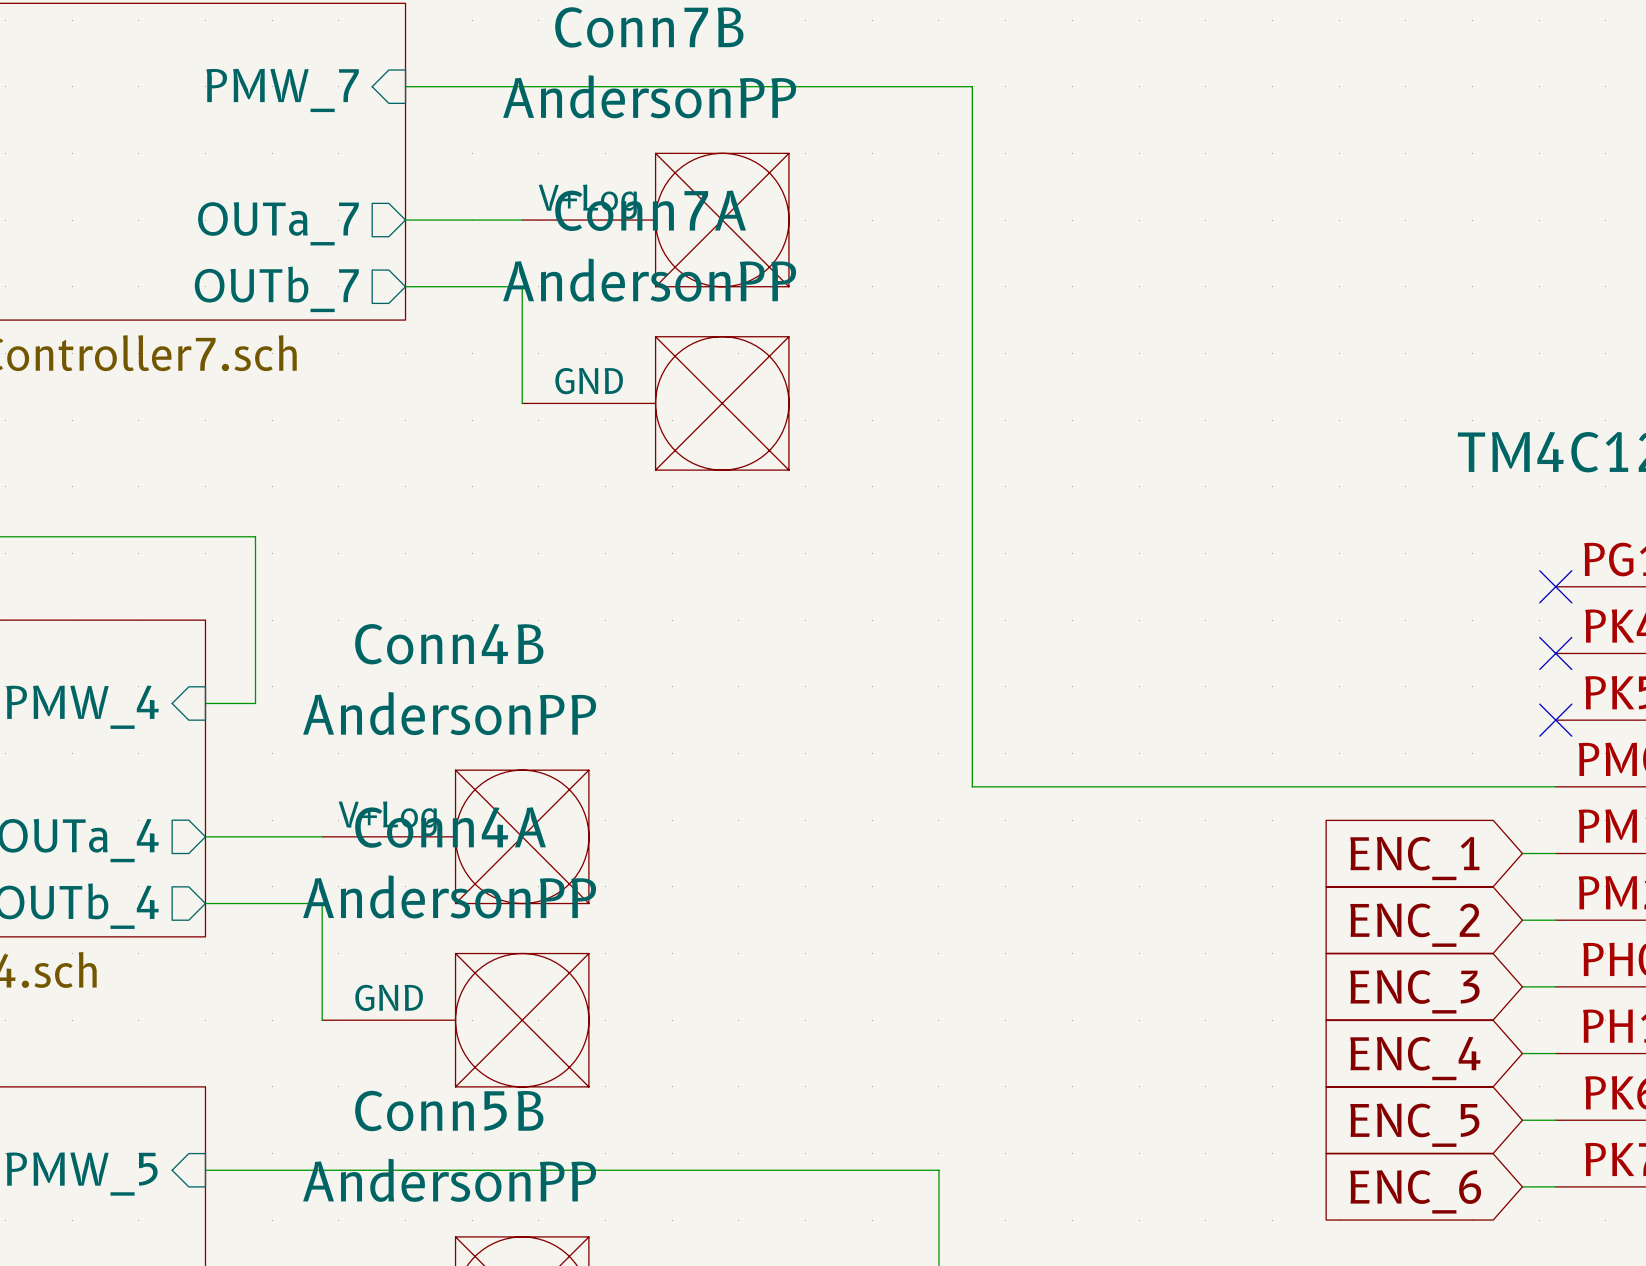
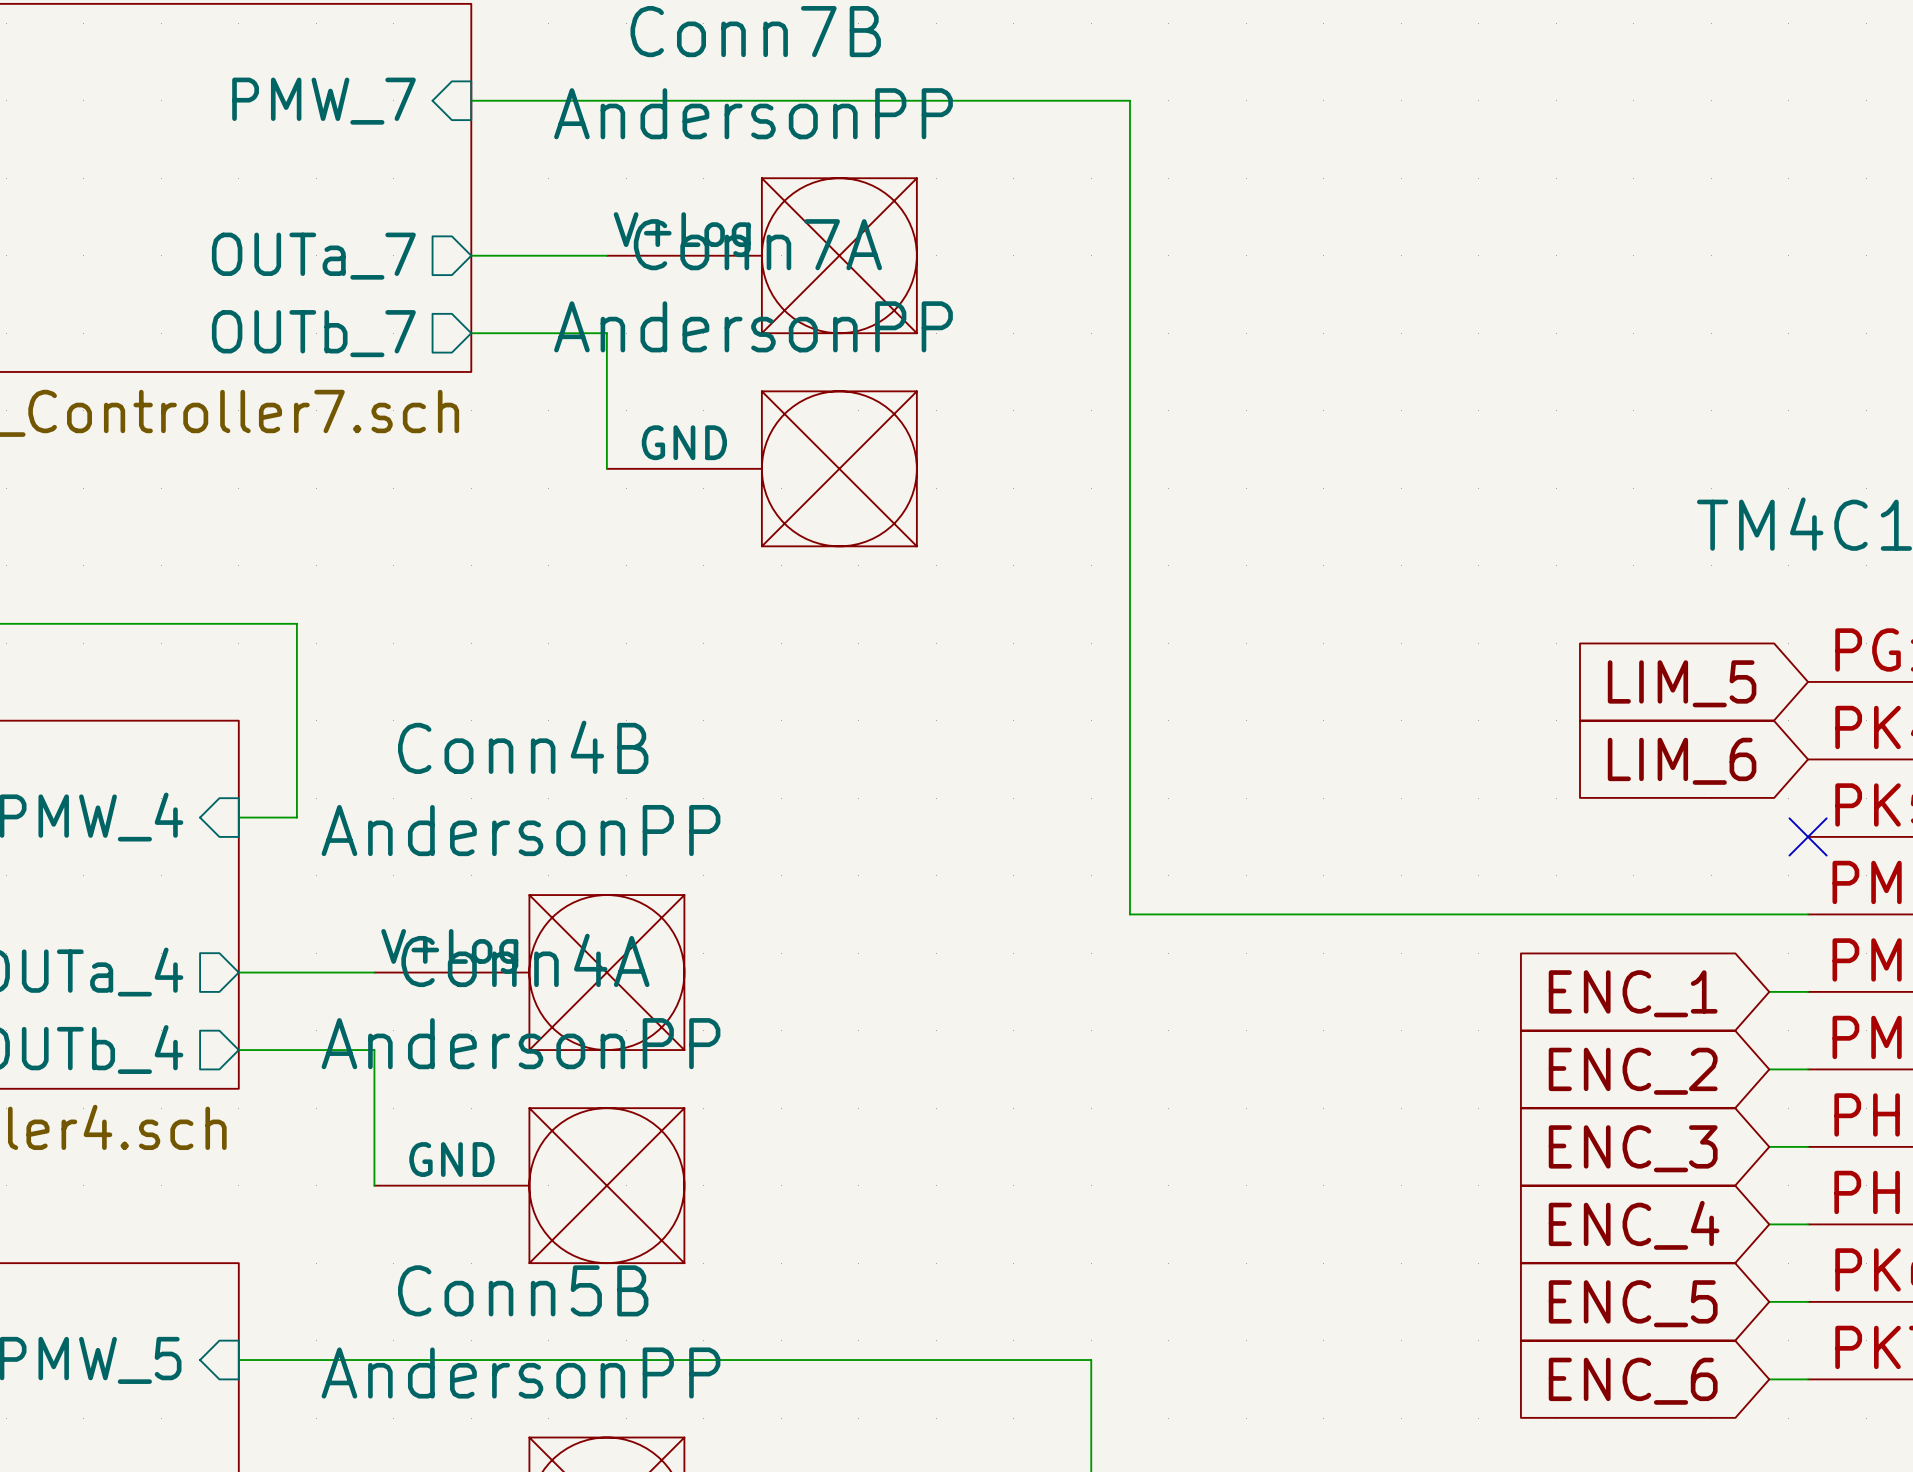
no-connect mark: (1555, 586) -> none
global label: none -> LIM_5 (1682, 683)
no-connect mark: (1555, 653) -> none
global label: none -> LIM_6 (1682, 761)

